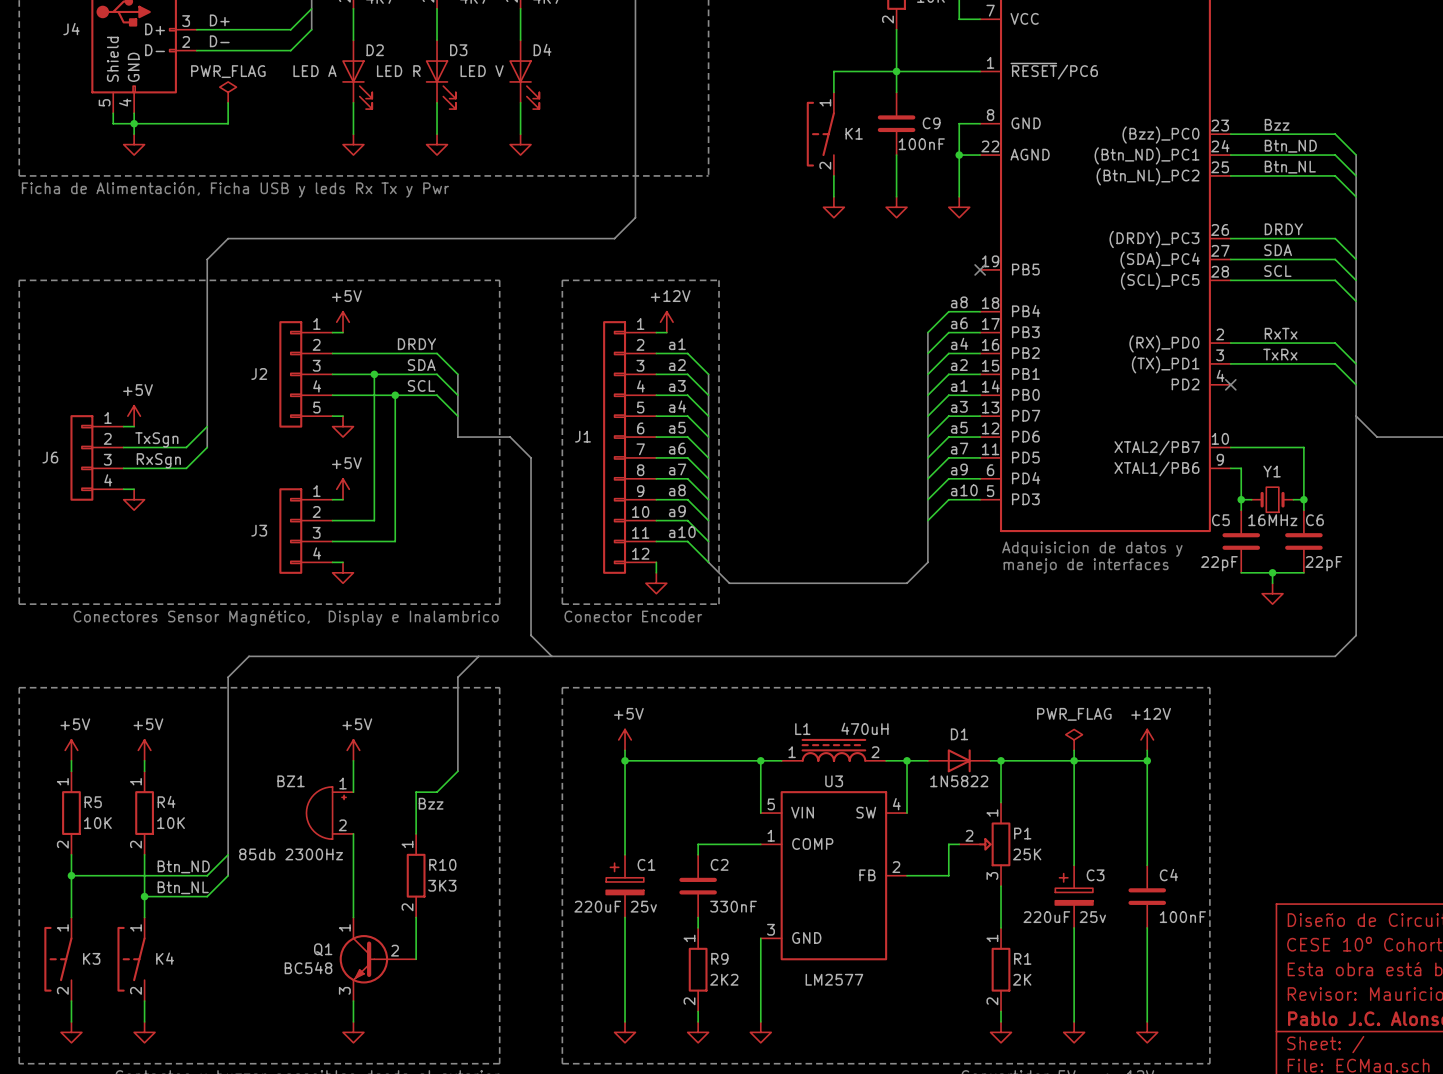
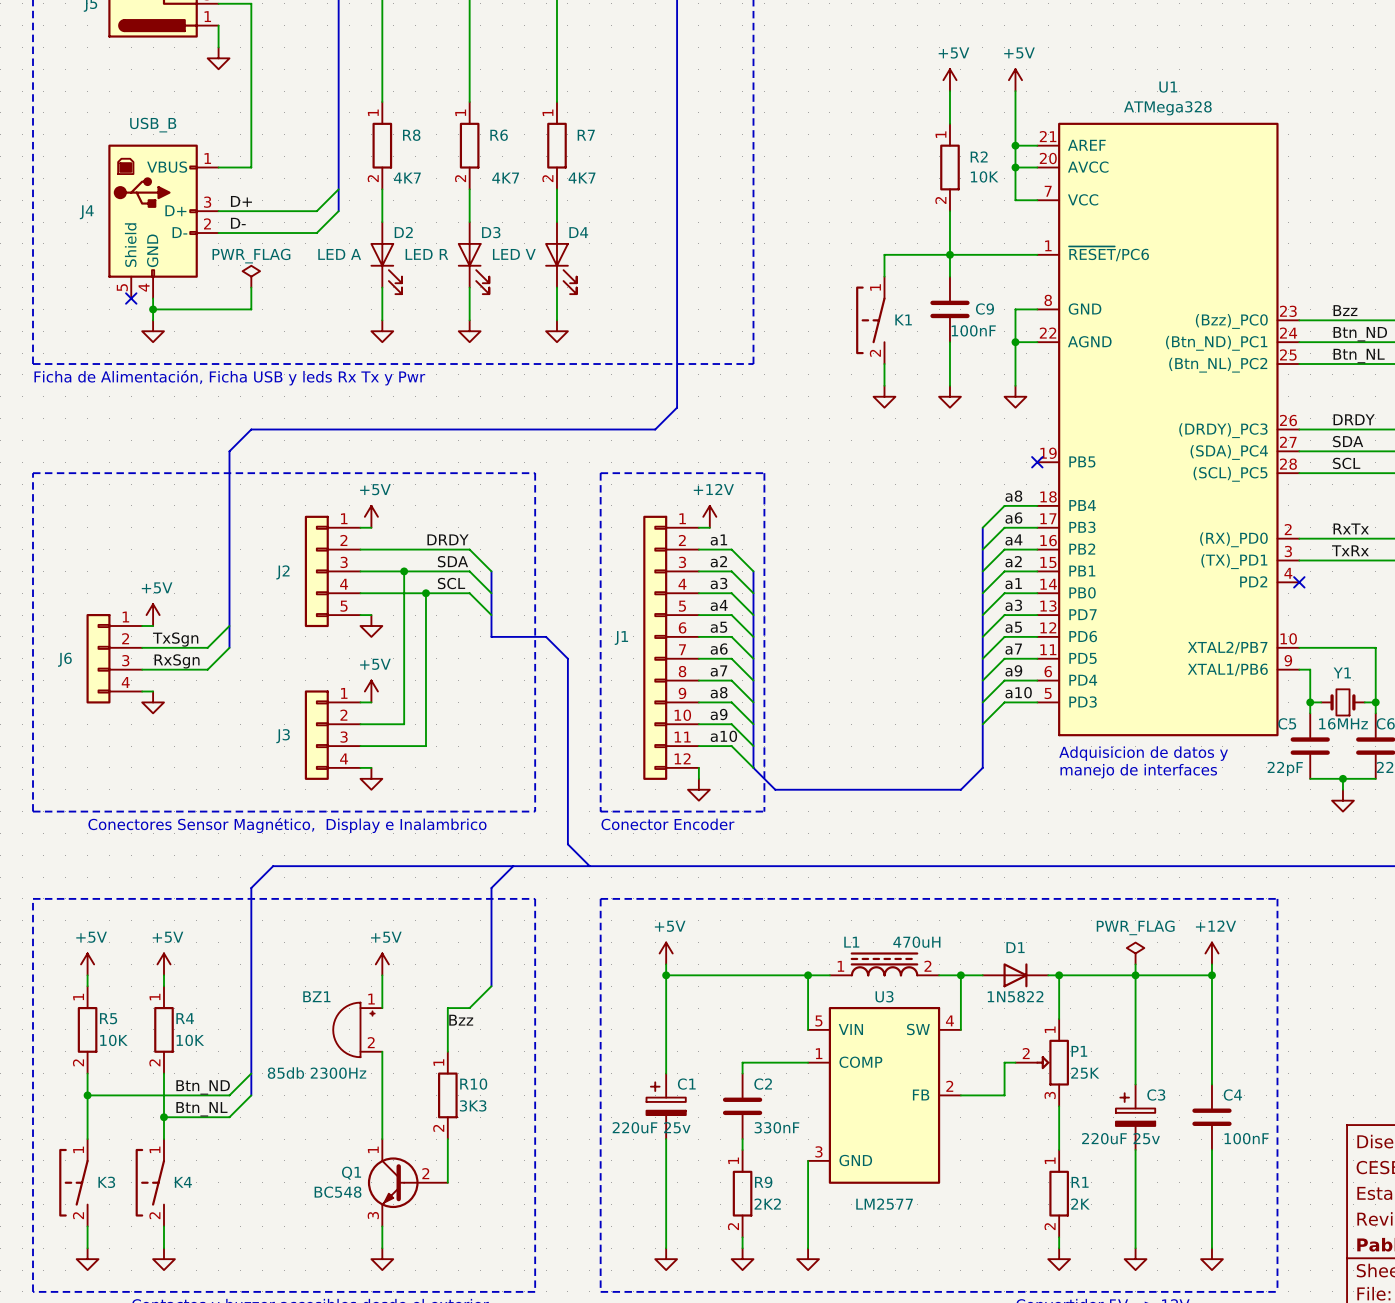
wire: (113, 113) (113, 123) (134, 123) -> none
no-connect mark: none -> (131, 298)

